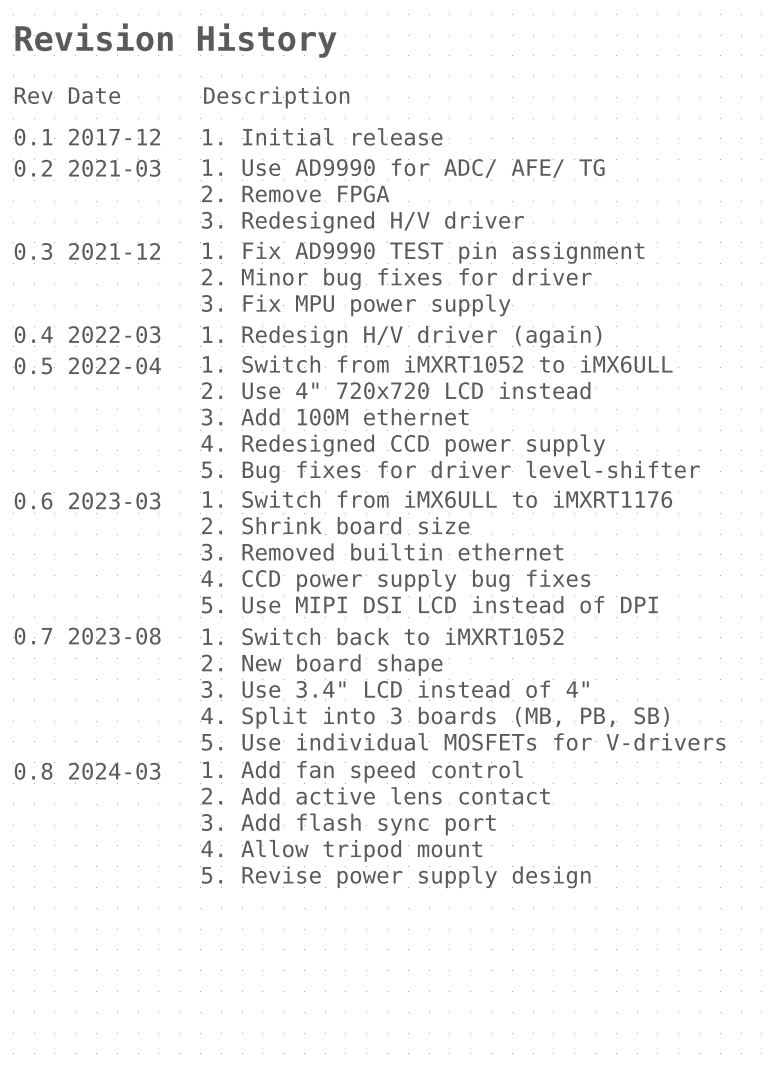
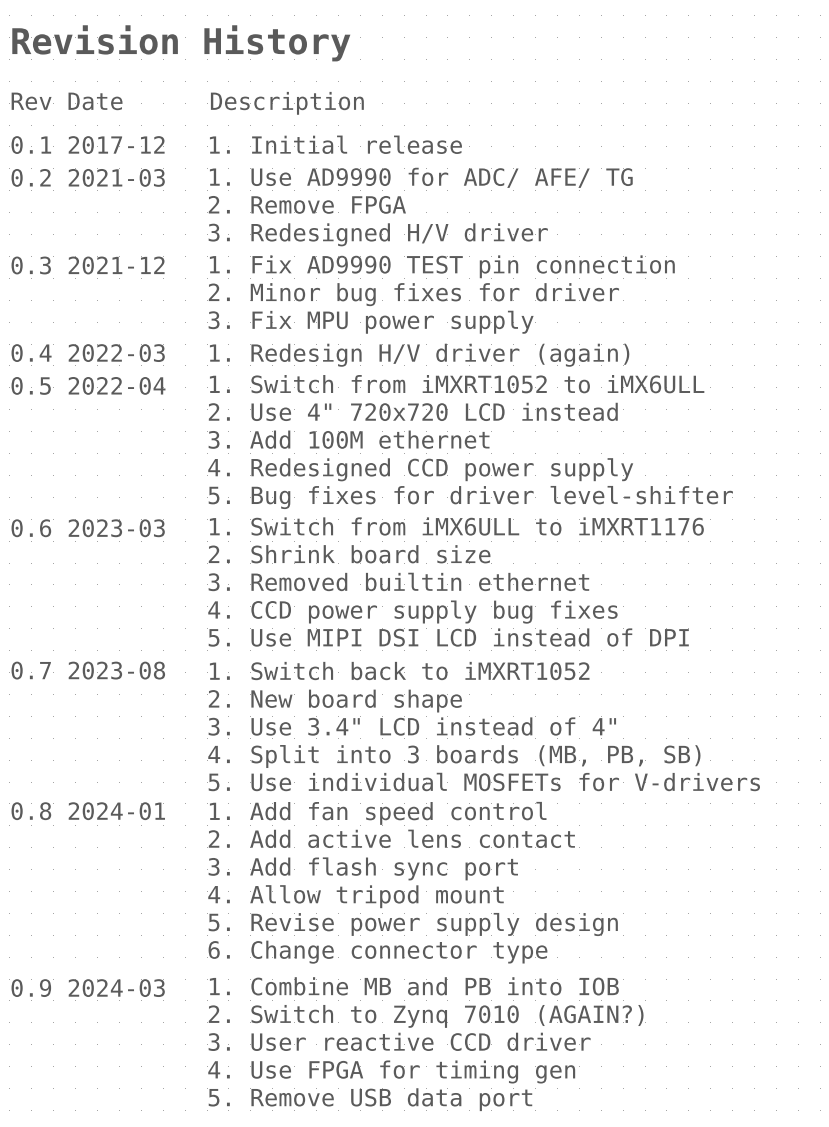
text: 1. Fix AD9990 TEST pin assignment (423, 252) -> 1. Fix AD9990 TEST pin connection (442, 266)
text: 0.8 2024-03 (87, 771) -> 0.8 2024-01 (88, 811)
text: none -> 6. Change connector type (378, 952)
text: none -> 1. Combine MB and PB into IOB (414, 986)
text: none -> 0.9 2024-03 (88, 988)
text: none -> 2. Switch to Zynq 7010 (AGAIN?) (426, 1016)
text: none -> 3. User reactive CCD driver (399, 1041)
text: none -> 4. Use FPGA for timing gen (391, 1071)
text: none -> 5. Remove USB data port (370, 1099)

